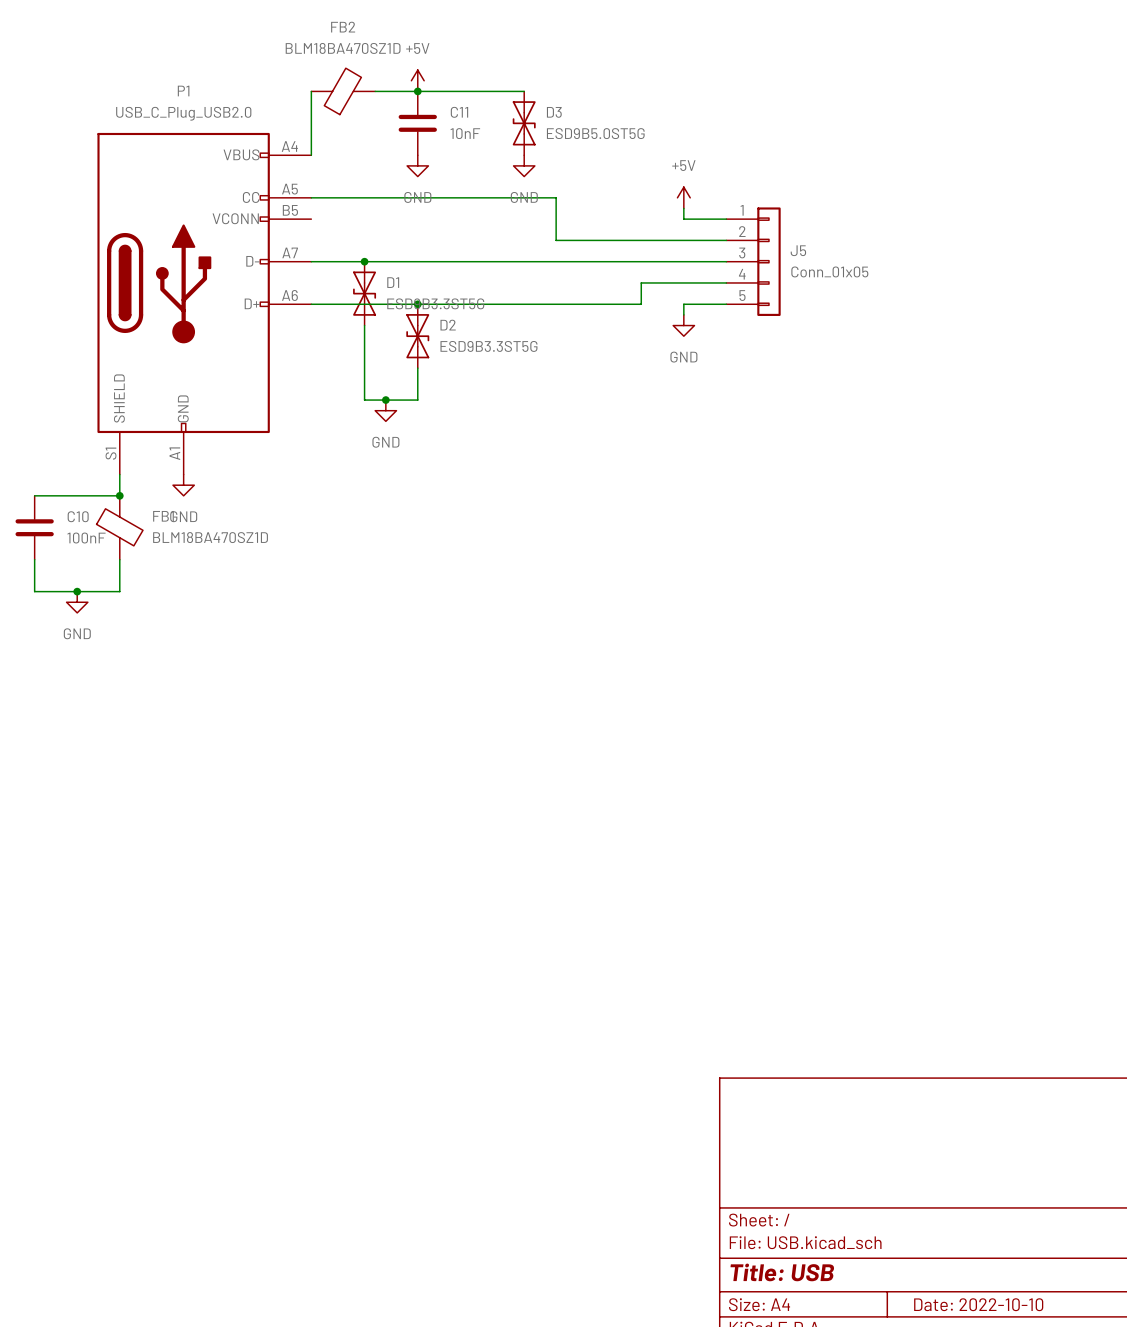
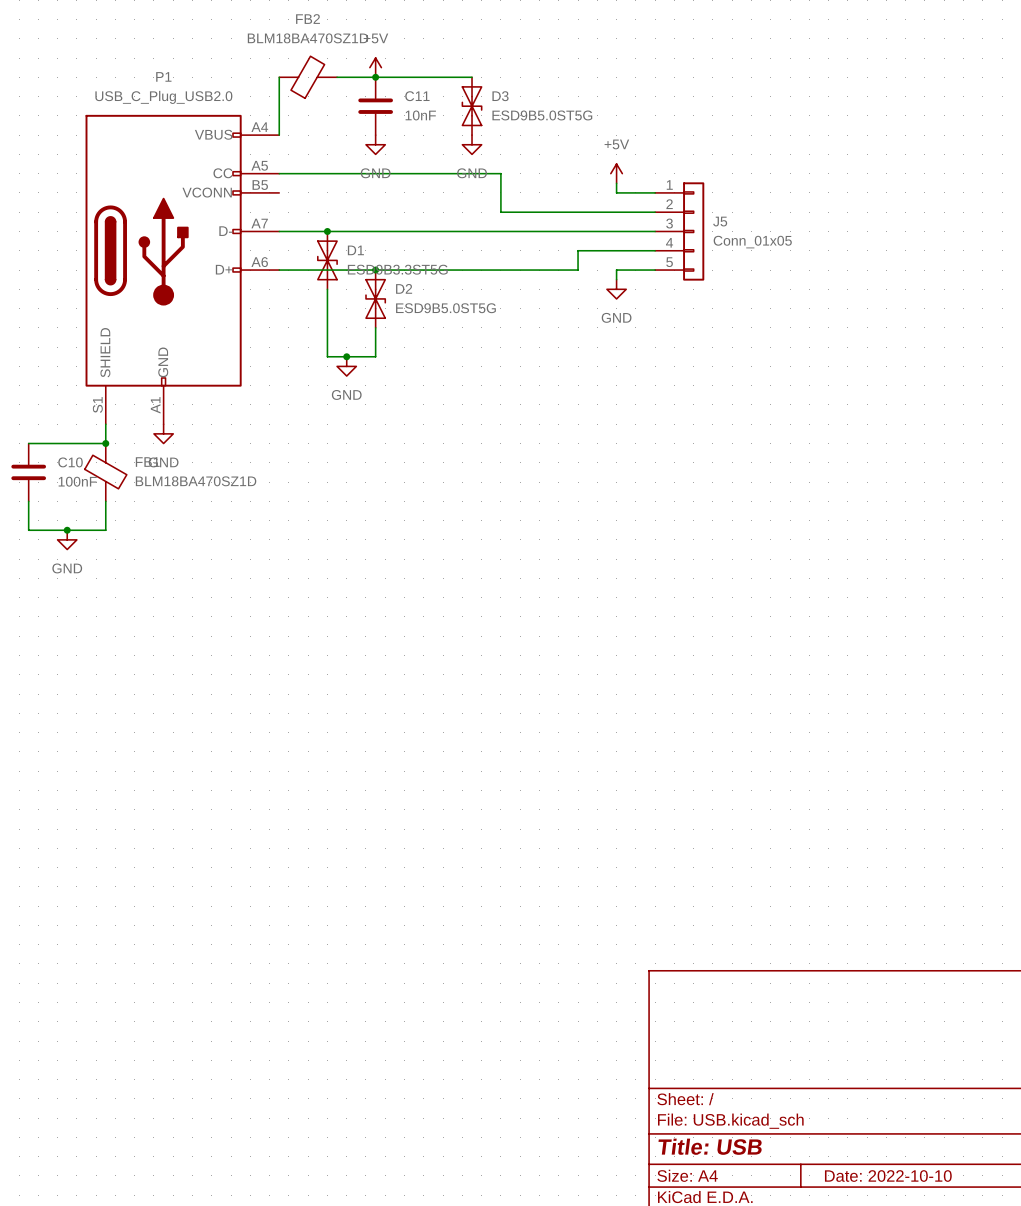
D2 value: ESD9B3.3ST5G (488, 346) -> ESD9B5.0ST5G (445, 308)

